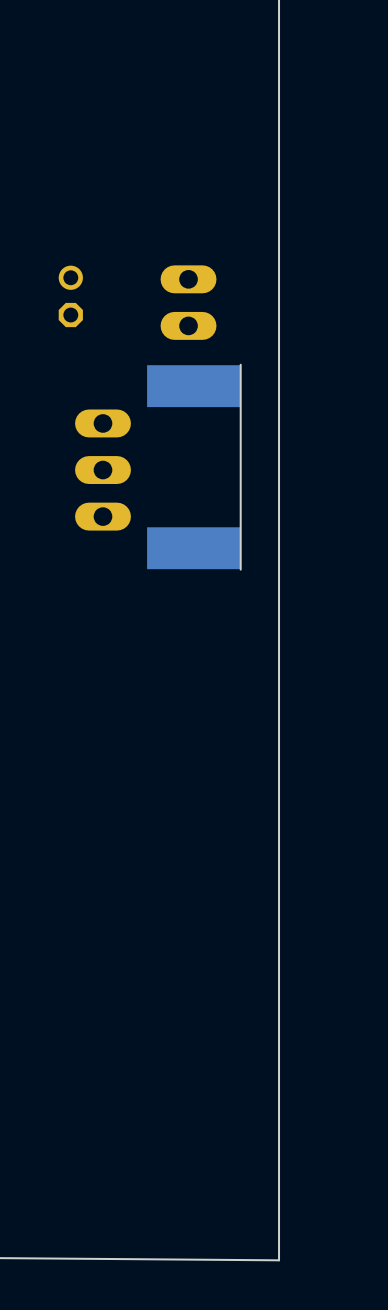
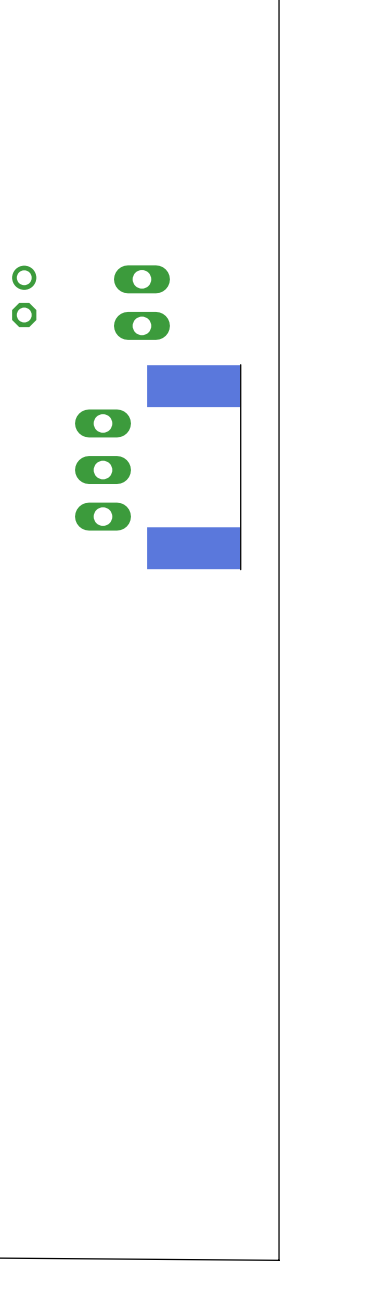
part position: (70, 296) -> (24, 296)
part position: (188, 302) -> (141, 302)

